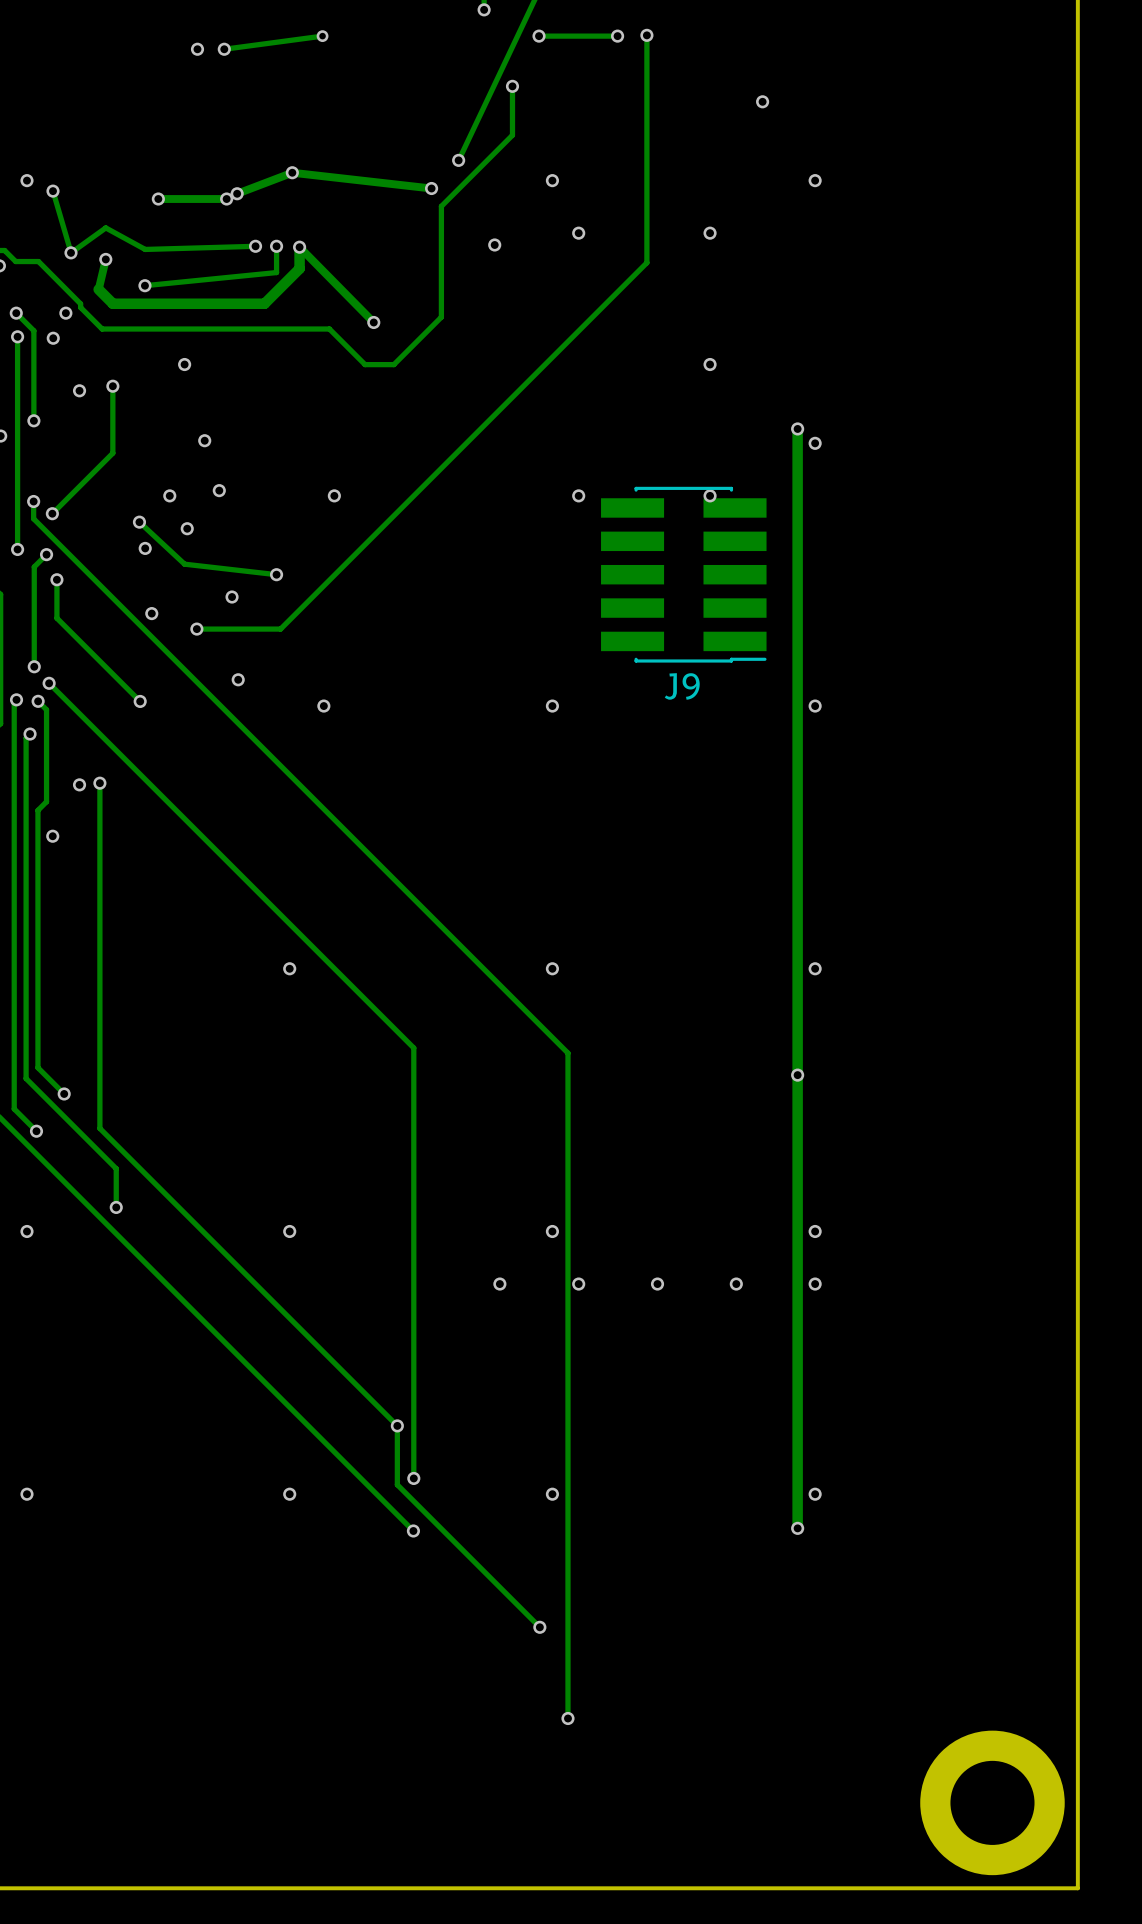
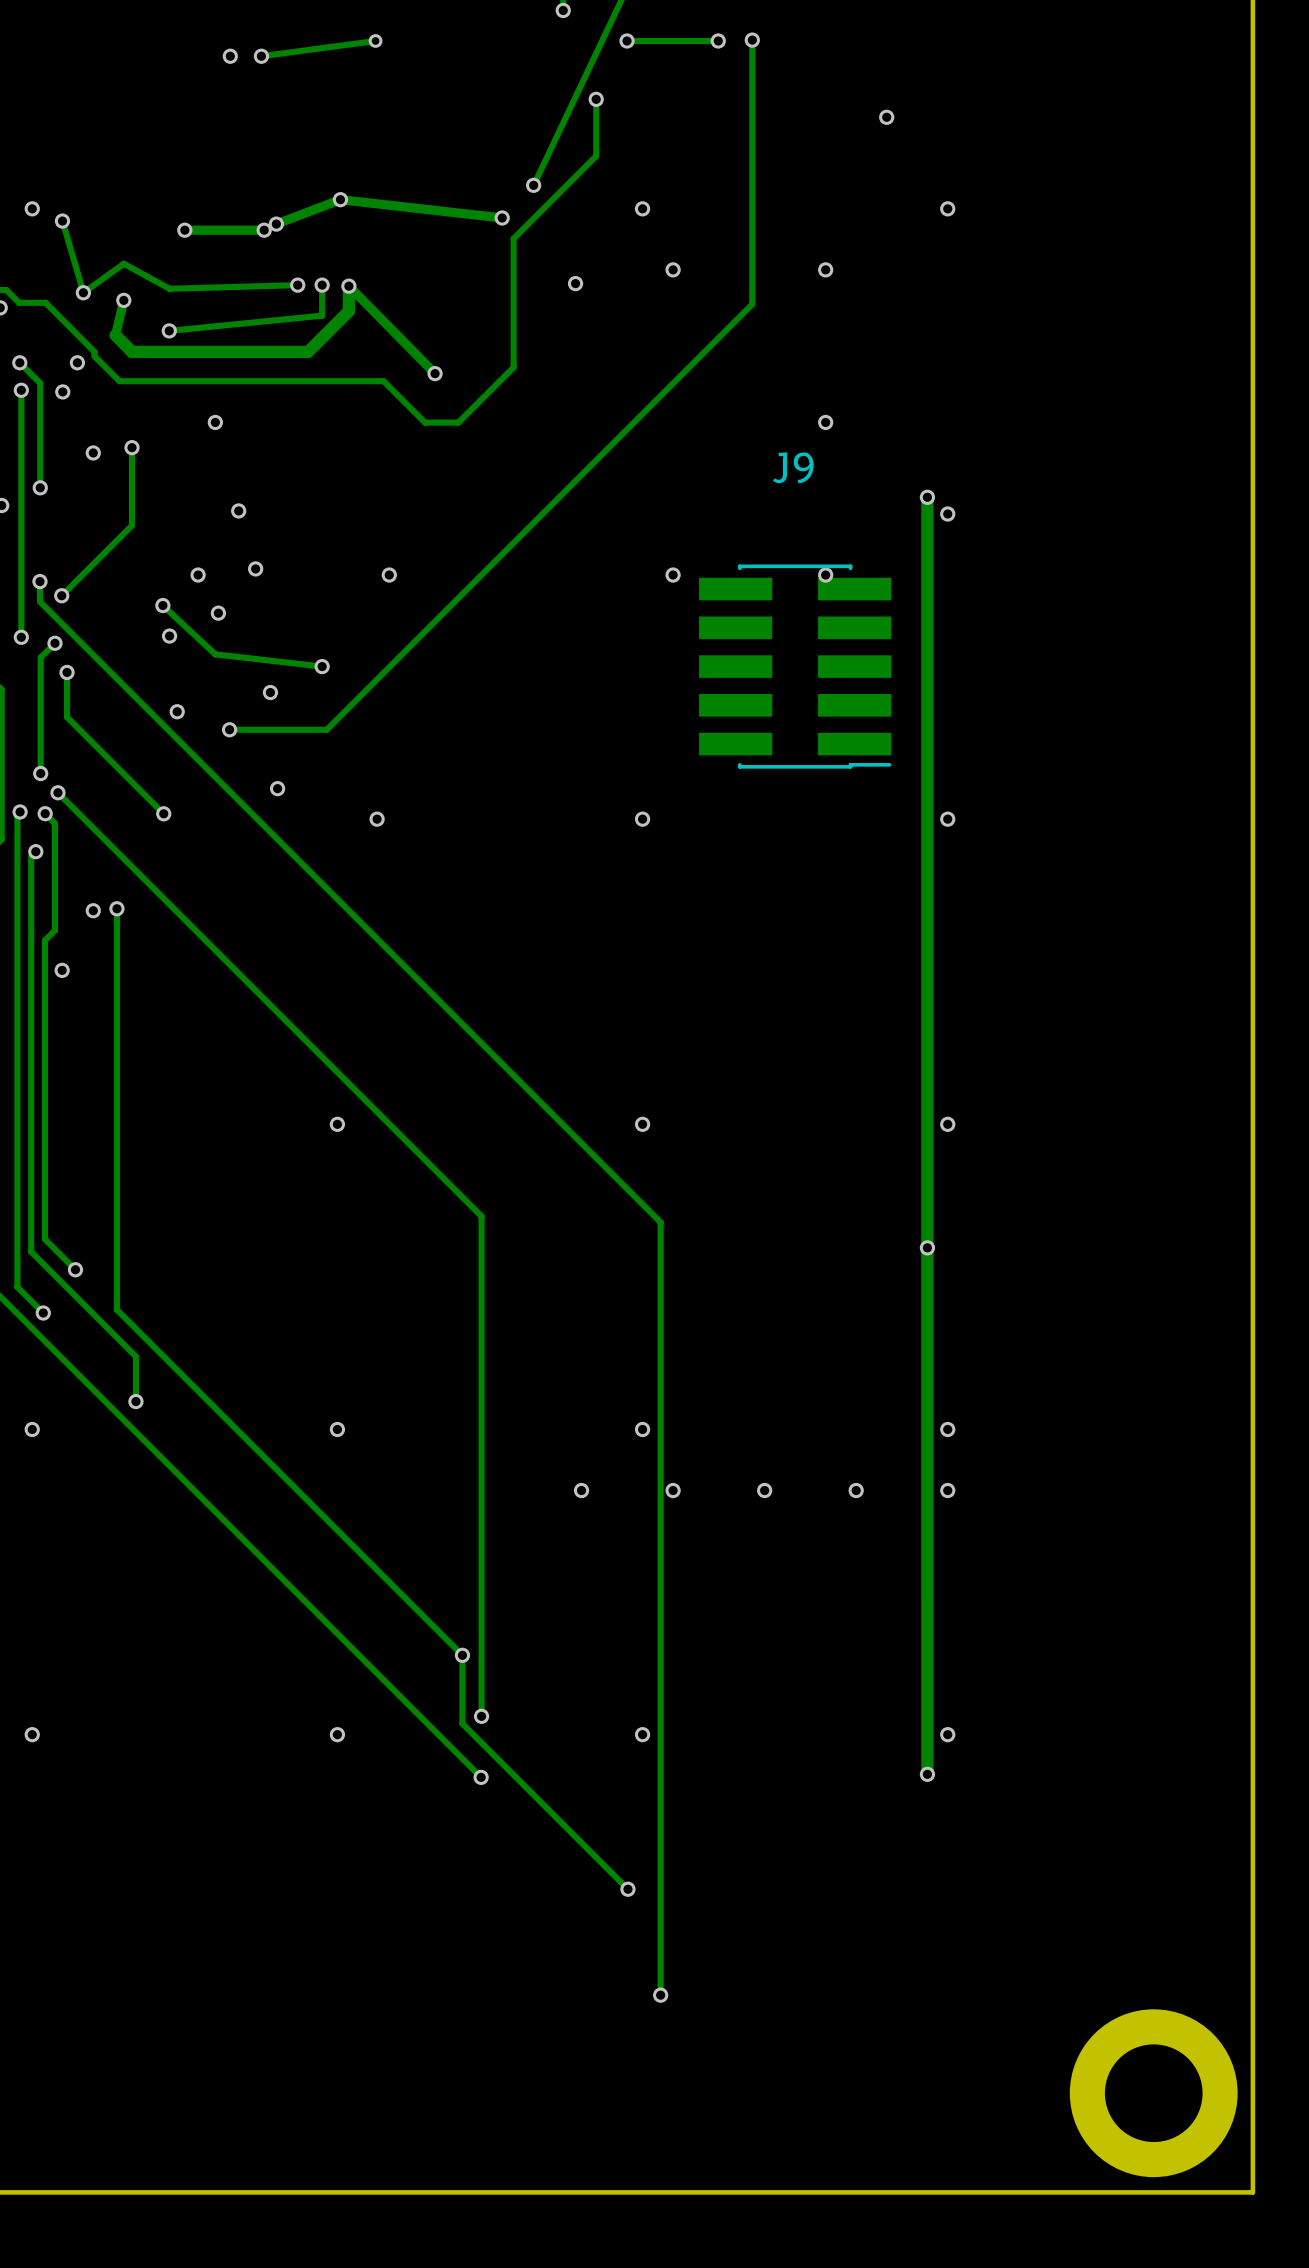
J9 name position: J9 (682, 686) -> J9 (793, 467)

